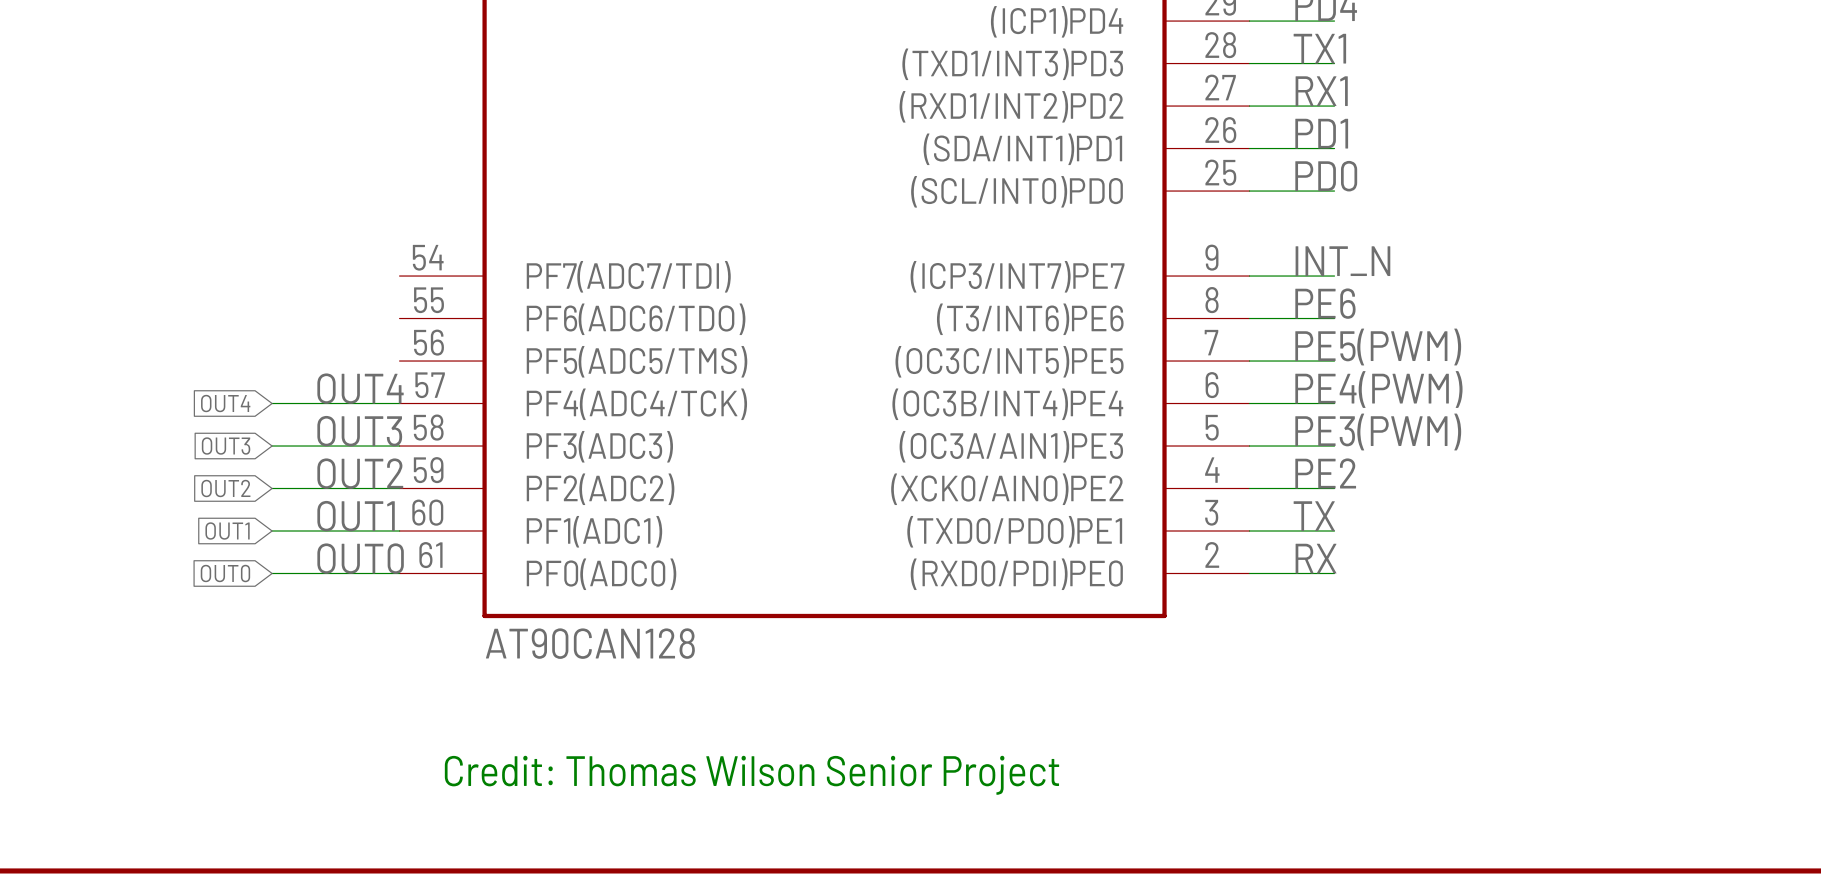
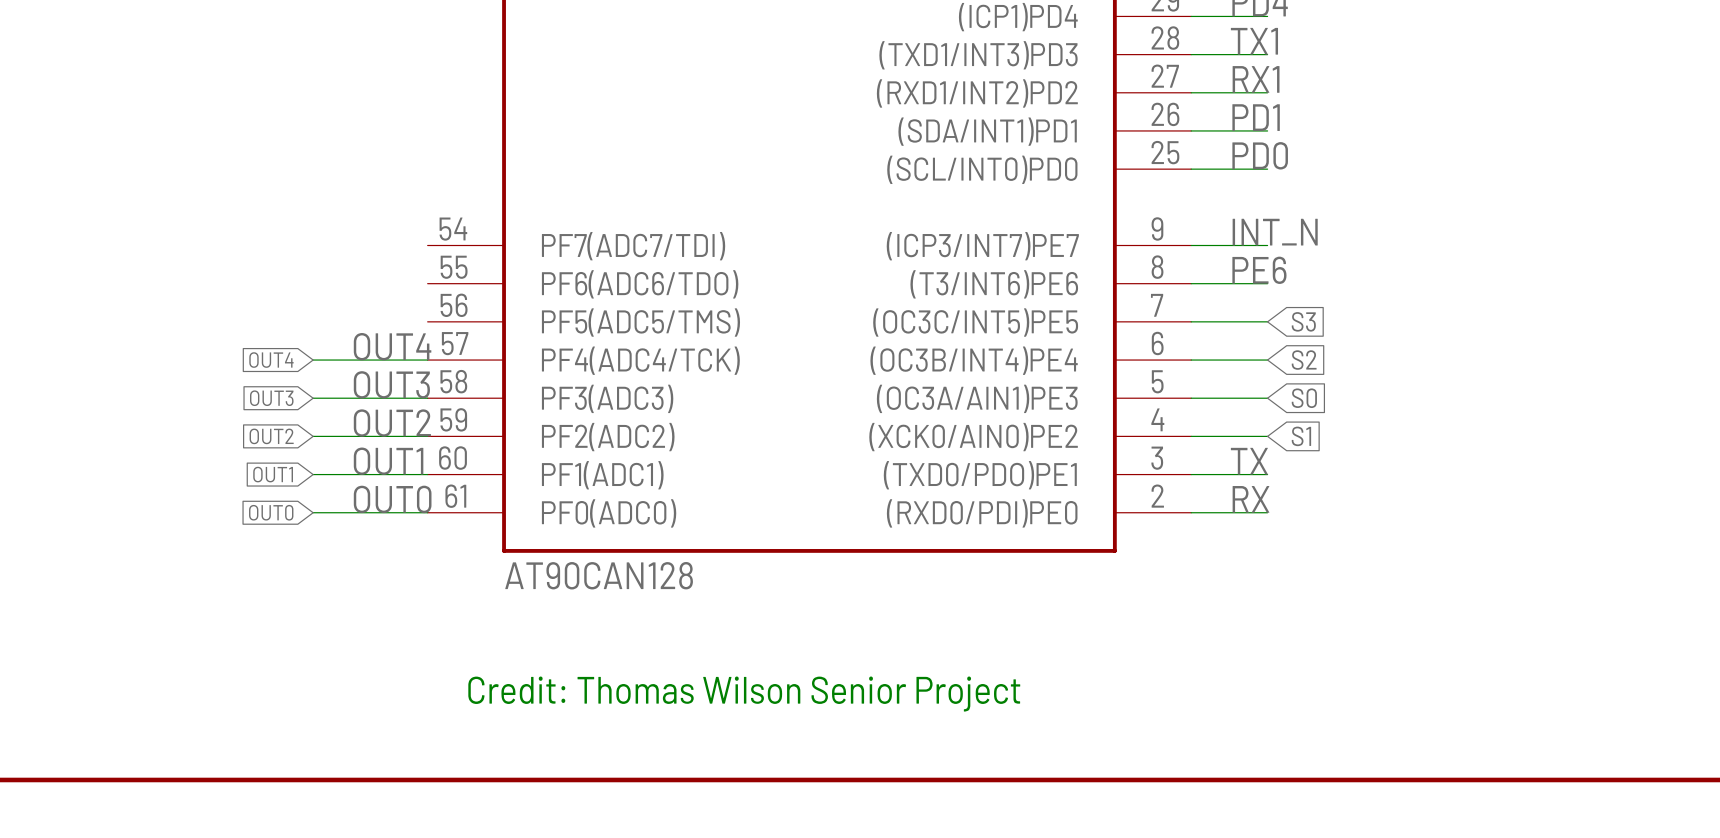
label: PE5(PWM) (1378, 347) -> none
global label: none -> S3 (1303, 321)
label: PE4(PWM) (1378, 389) -> none
global label: none -> S2 (1304, 360)
label: PE3(PWM) (1378, 432) -> none
global label: none -> S0 (1304, 398)
label: PE2 (1325, 473) -> none
global label: none -> S1 (1301, 436)

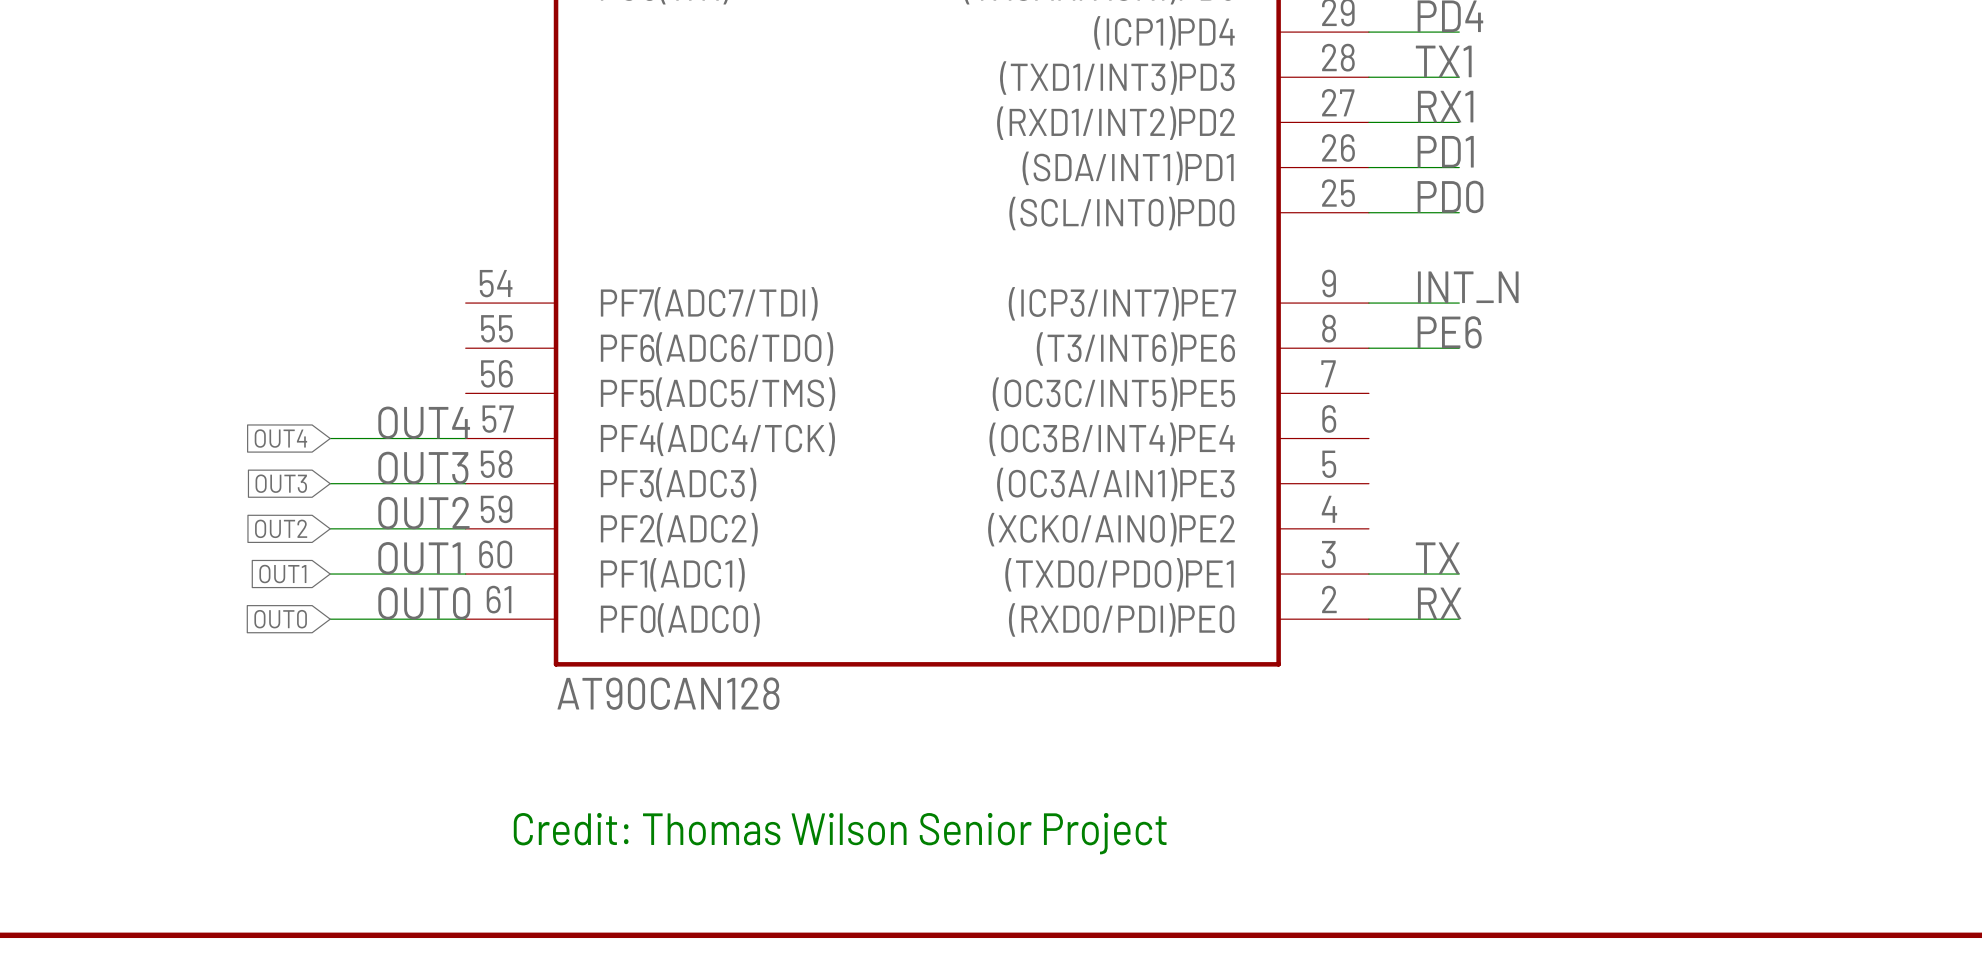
wire: (1191, 321) (1267, 321) -> none
global label: S3 (1303, 321) -> none
wire: (1191, 360) (1267, 360) -> none
global label: S2 (1304, 360) -> none
wire: (1191, 398) (1267, 398) -> none
global label: S0 (1304, 398) -> none
wire: (1191, 436) (1267, 436) -> none
global label: S1 (1301, 436) -> none

